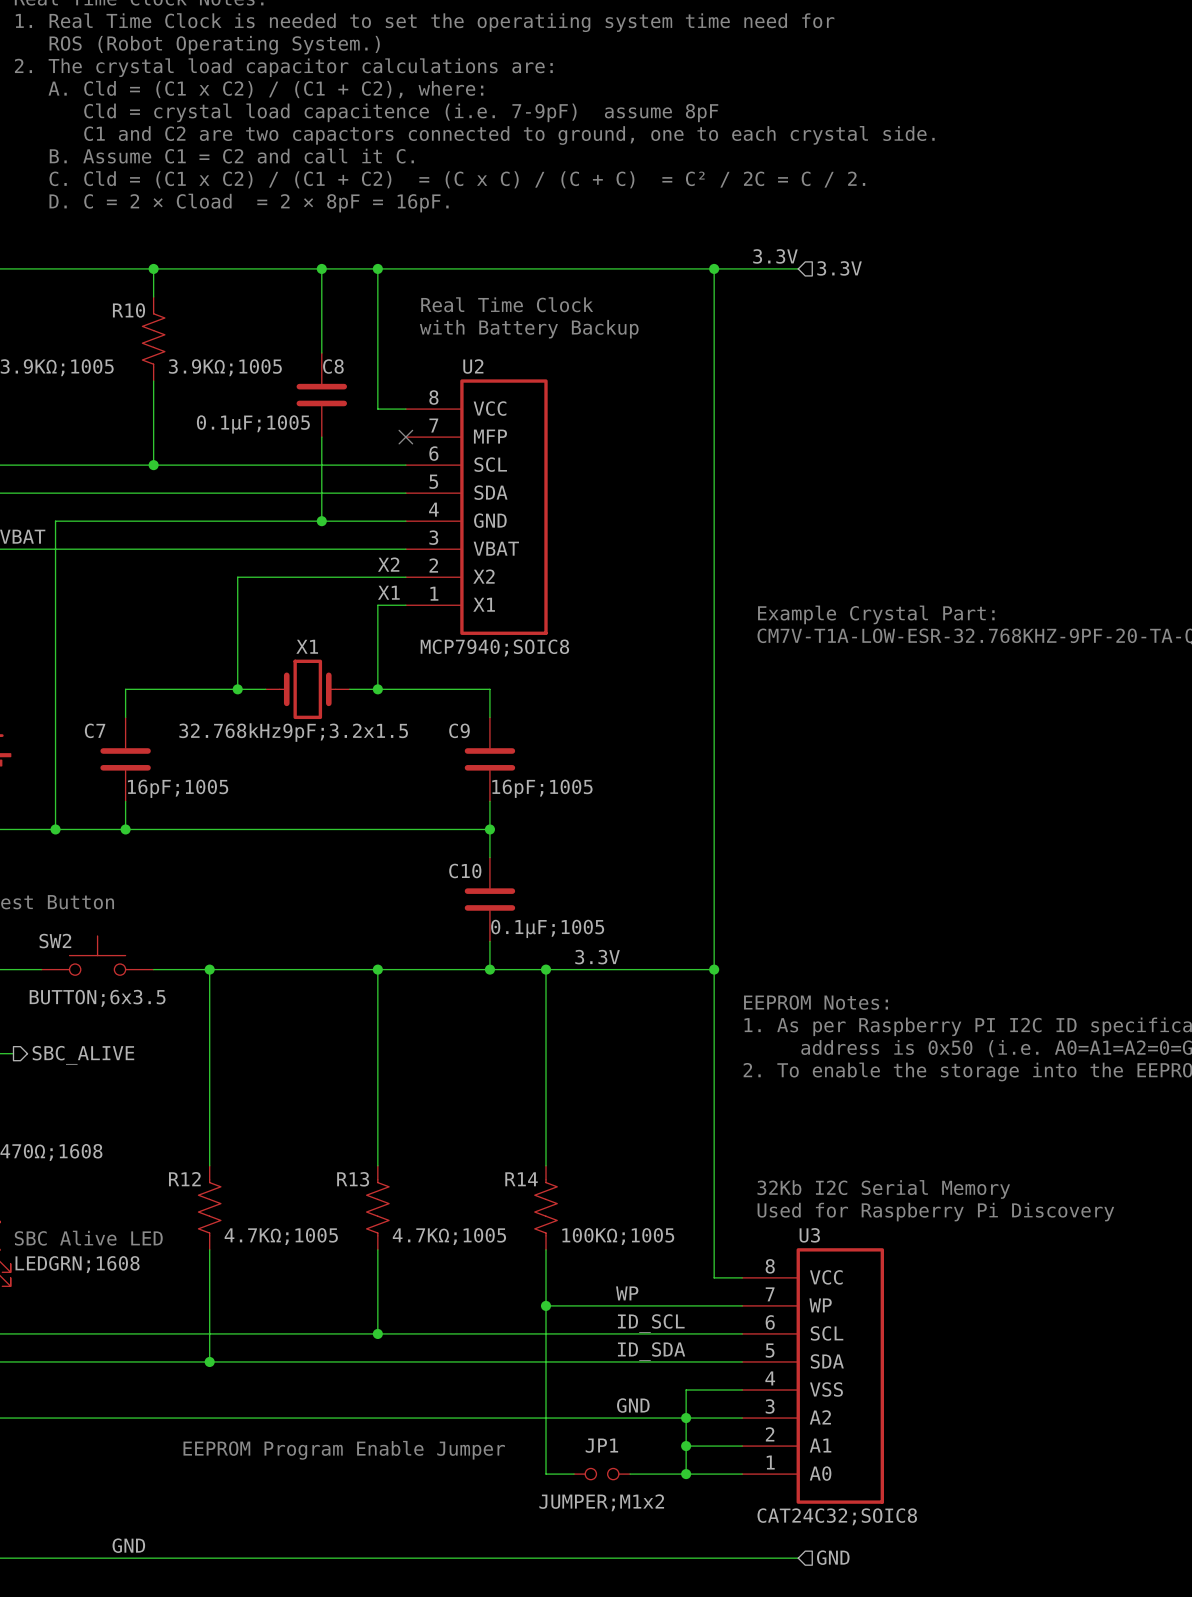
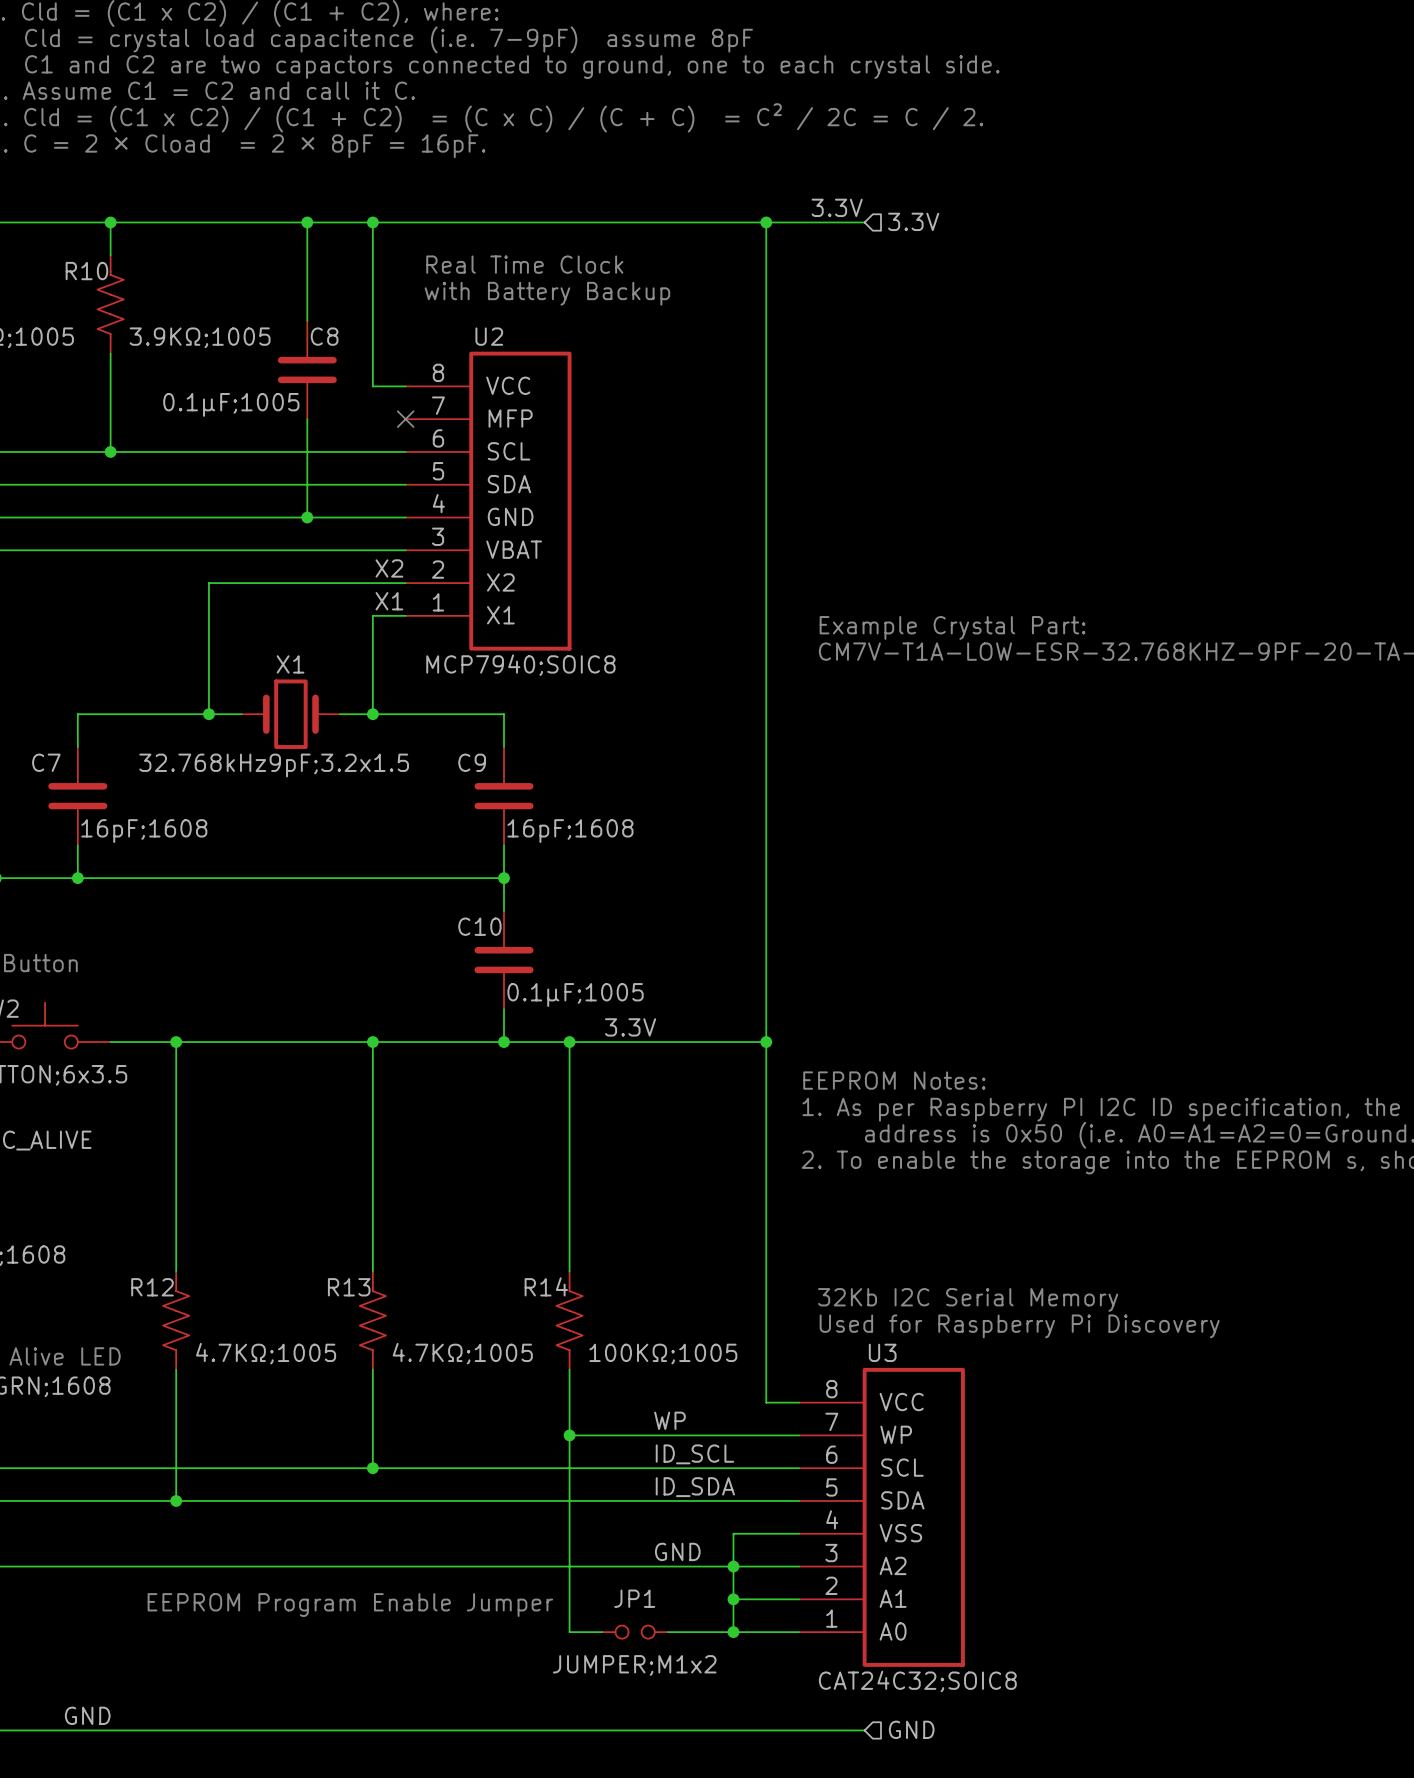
C7 value: 16pF;1005 (178, 788) -> 16pF;1608 (144, 831)
C9 value: 16pF;1005 (542, 788) -> 16pF;1608 (570, 831)

